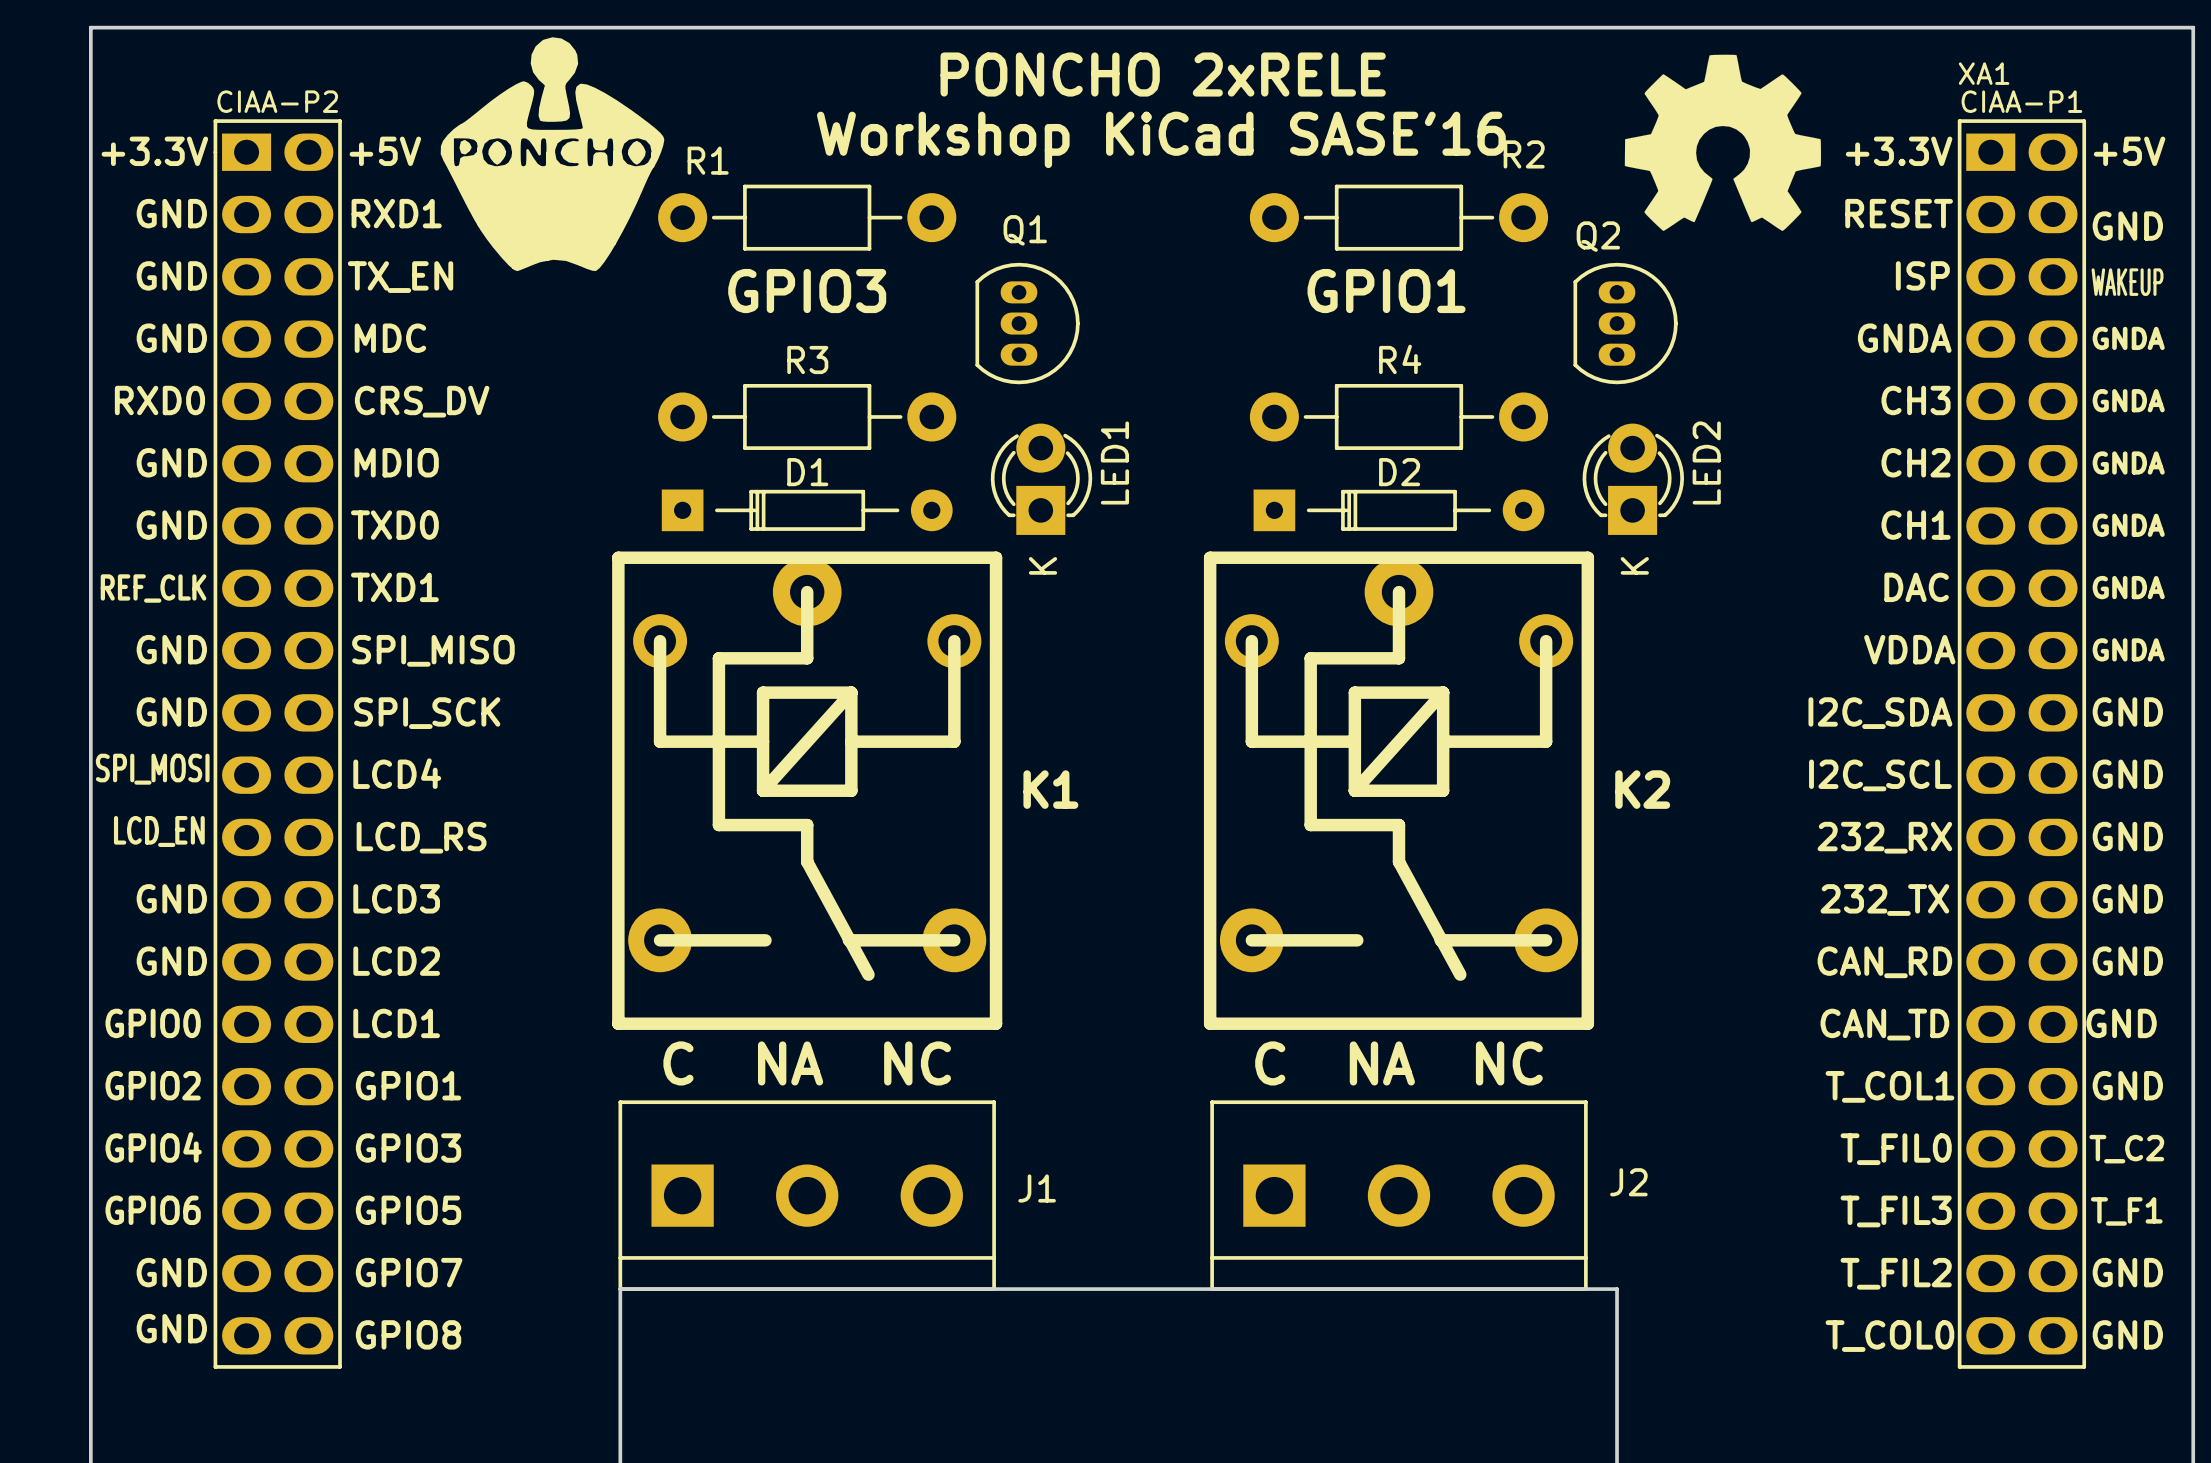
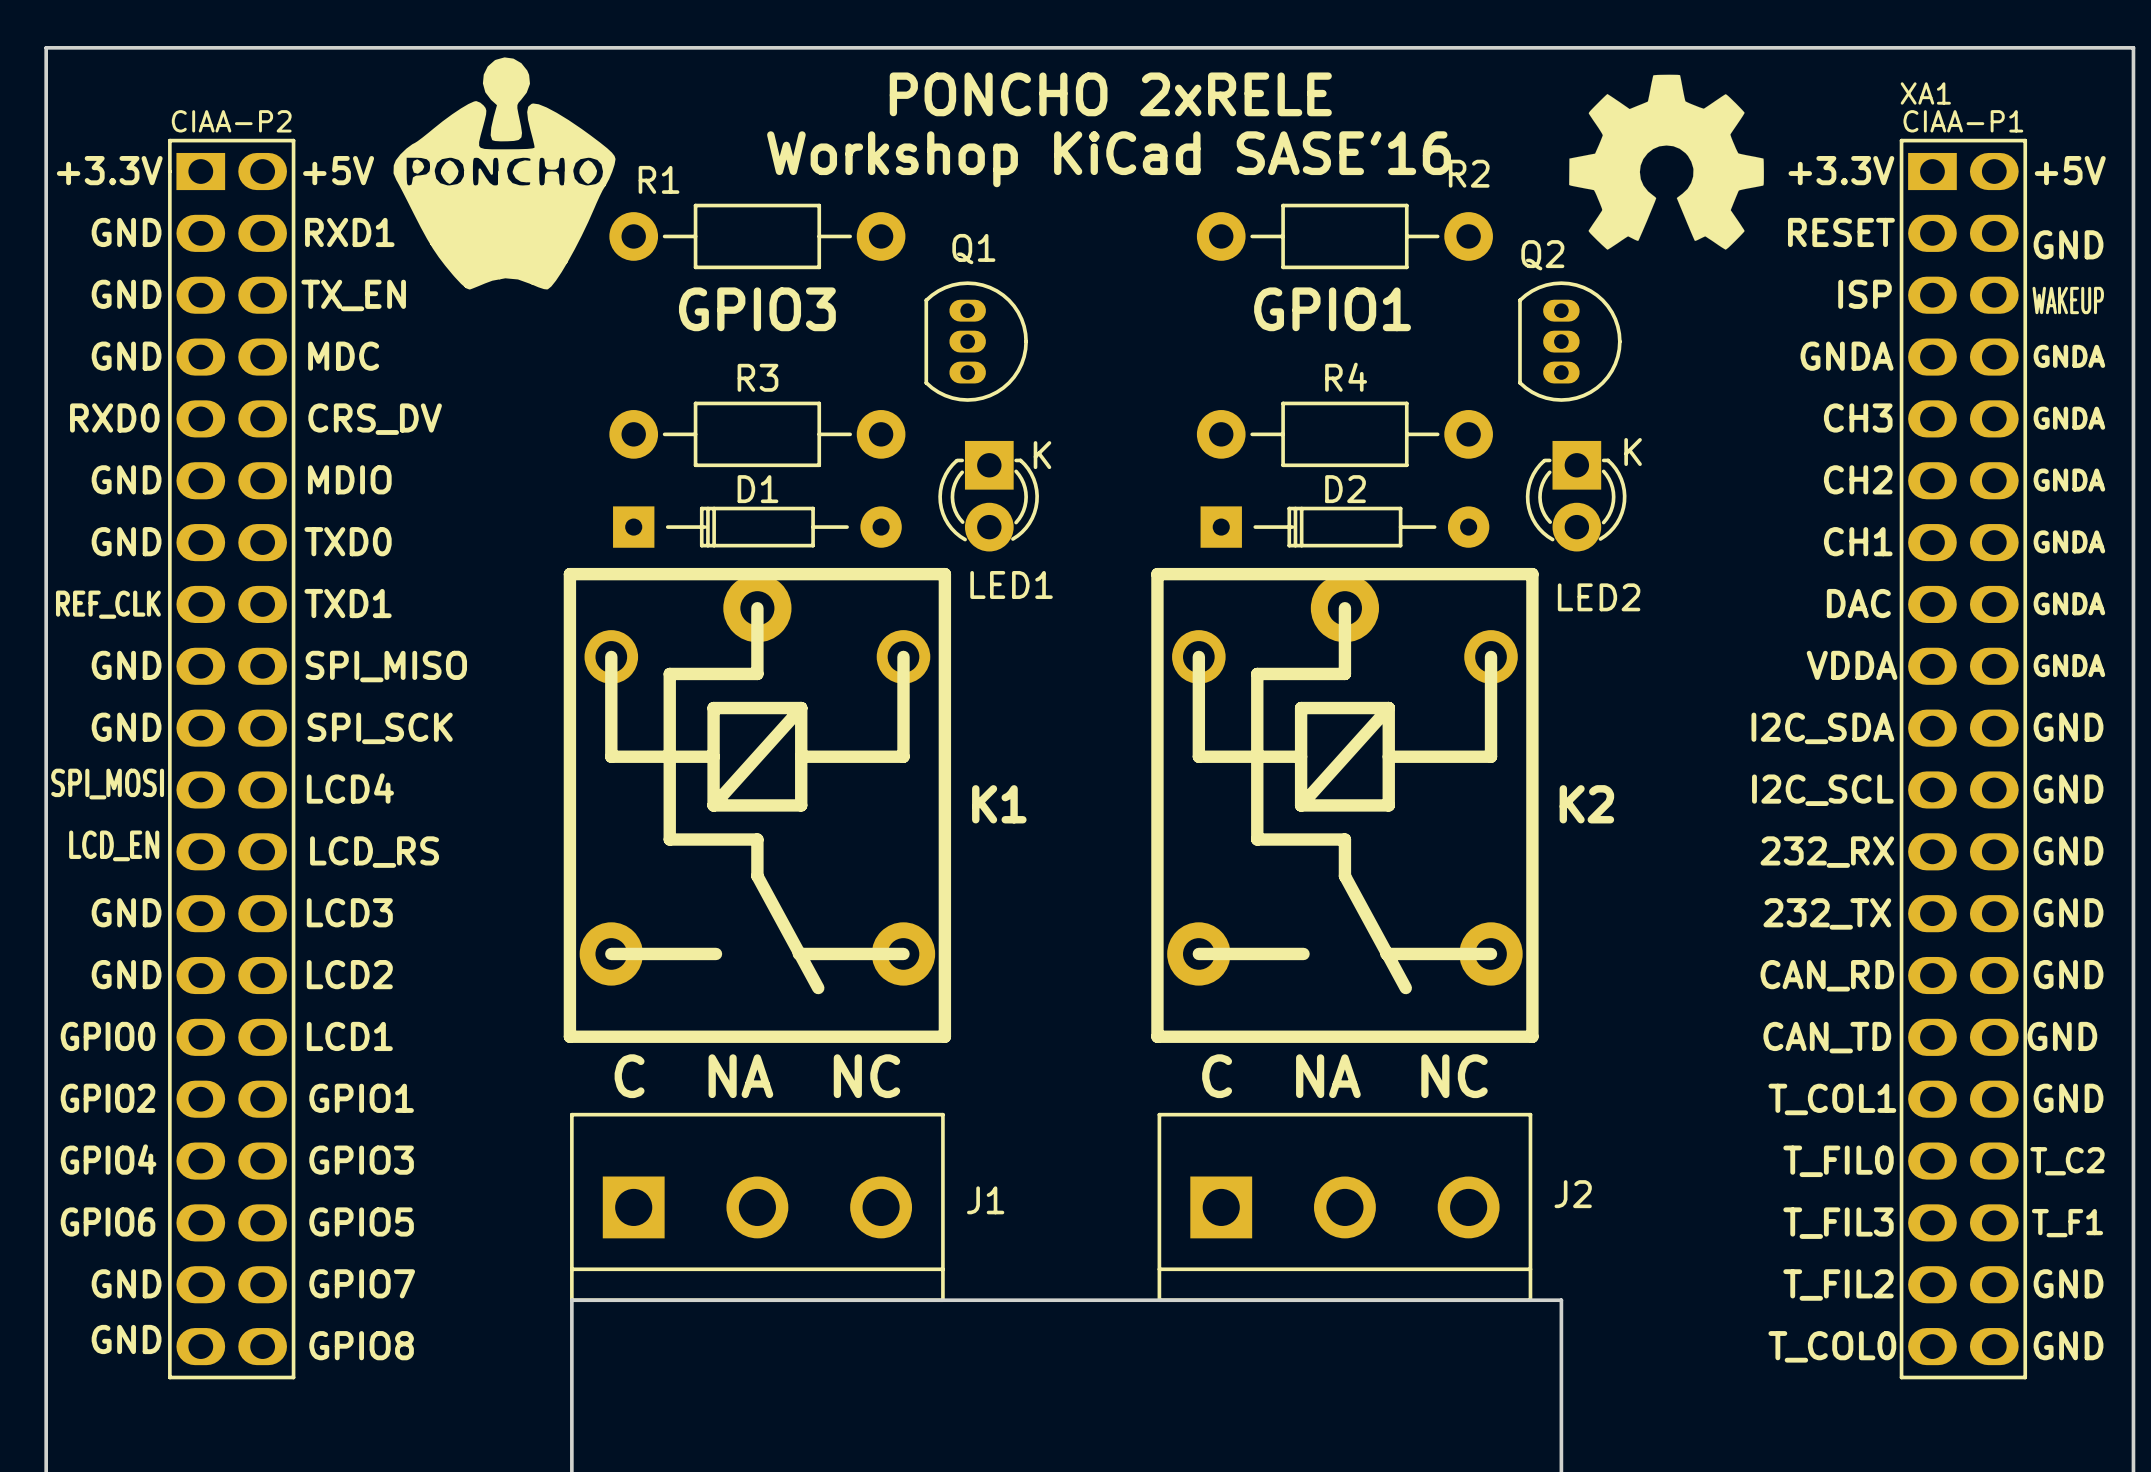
LED1 footprint: [990, 423, 1093, 535] -> [938, 440, 1039, 552]
LED2 footprint: [1582, 423, 1685, 535] -> [1525, 440, 1627, 552]
LED1 name position: LED1 (1114, 462) -> LED1 (1011, 584)
LED2 name position: LED2 (1706, 462) -> LED2 (1599, 597)

